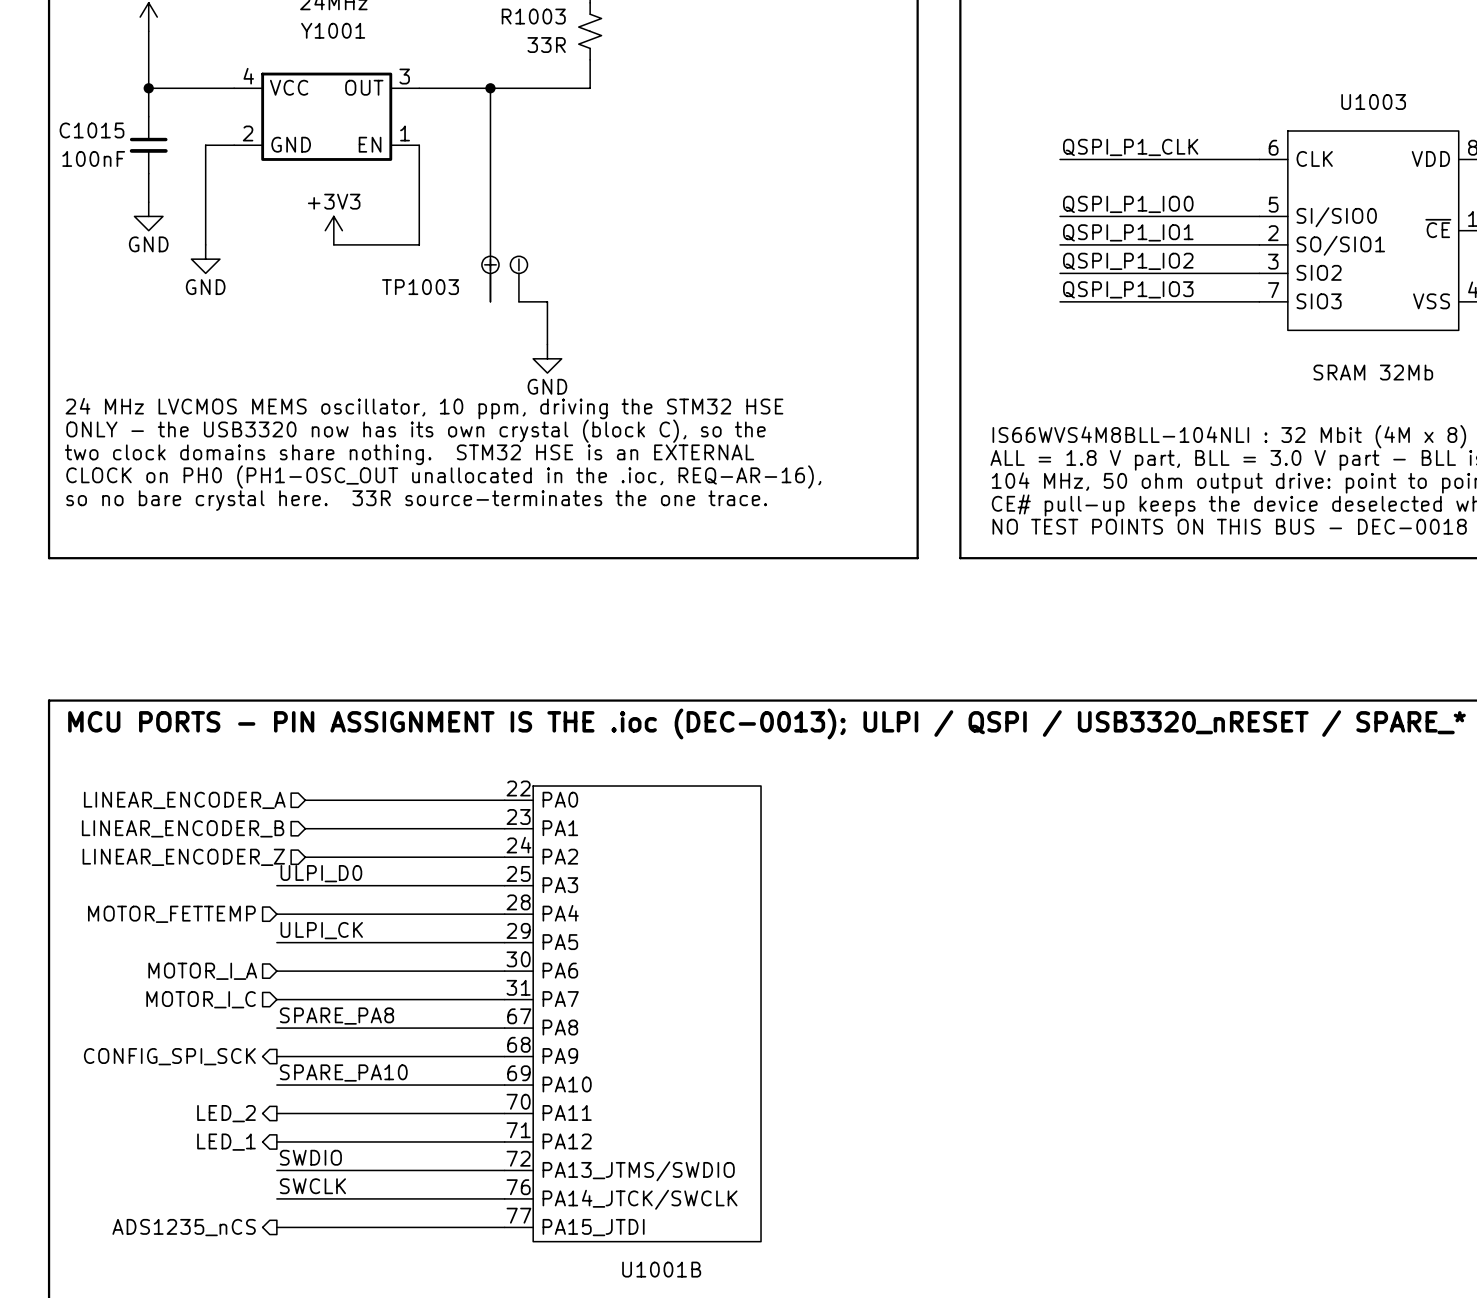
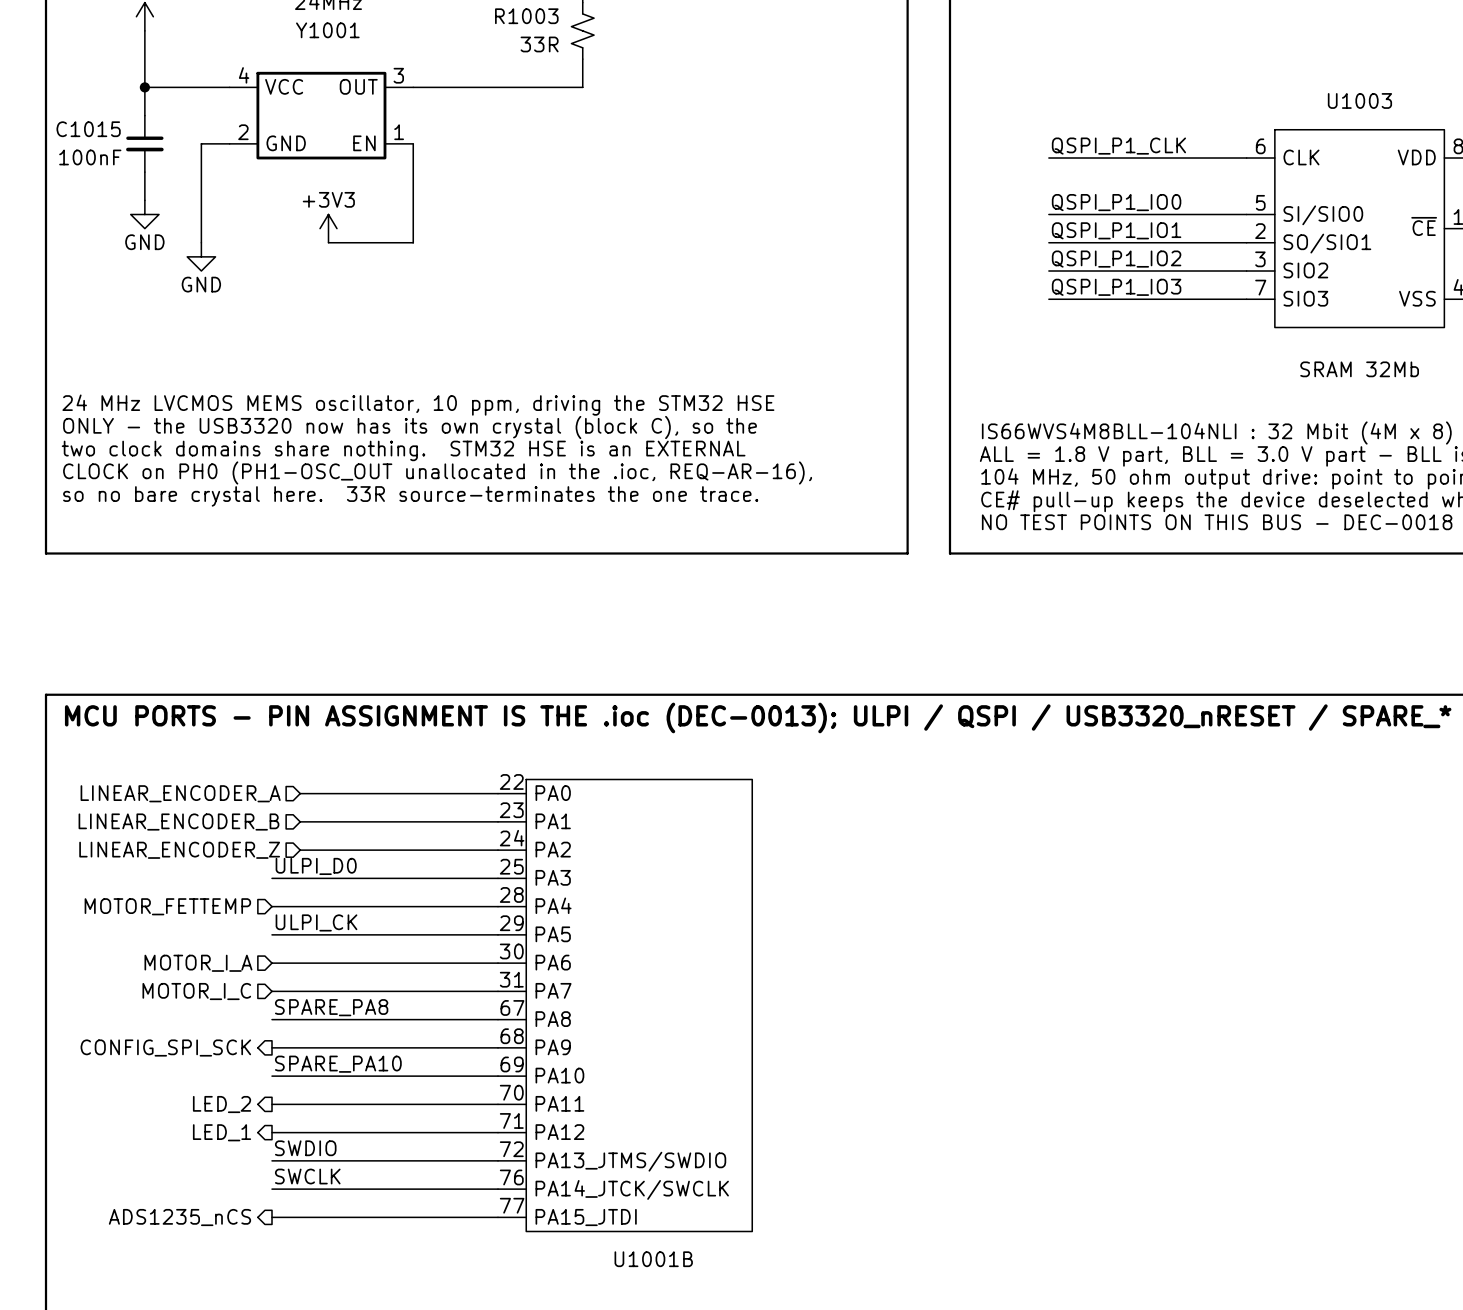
wire: (490, 88) (490, 301) -> none
junction: (490, 88) -> none
TP1003: (504, 279) -> none
wire: (518, 301) (547, 301) (547, 344) -> none
power symbol: GND (547, 358) -> none

